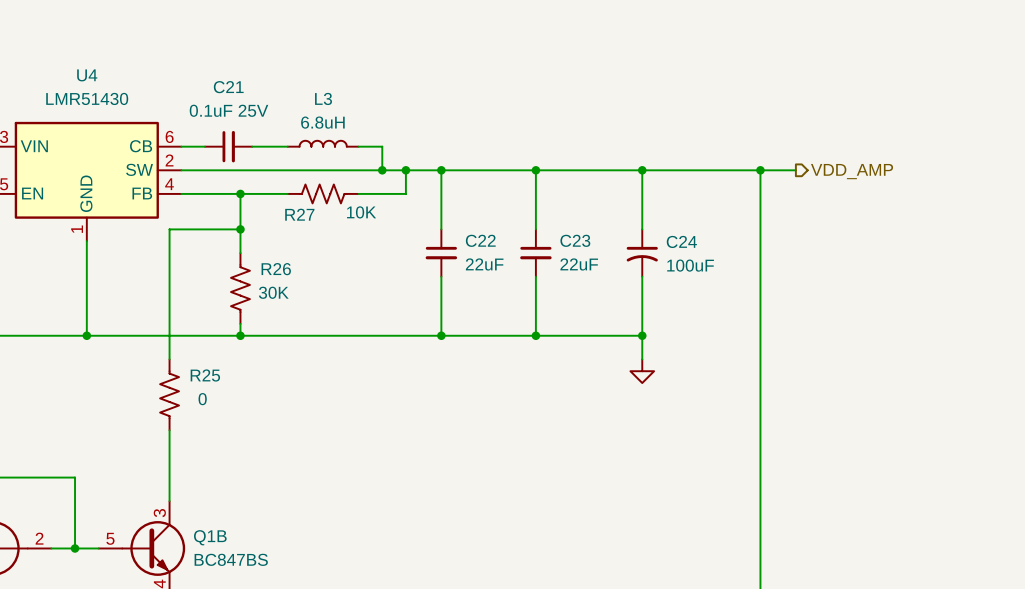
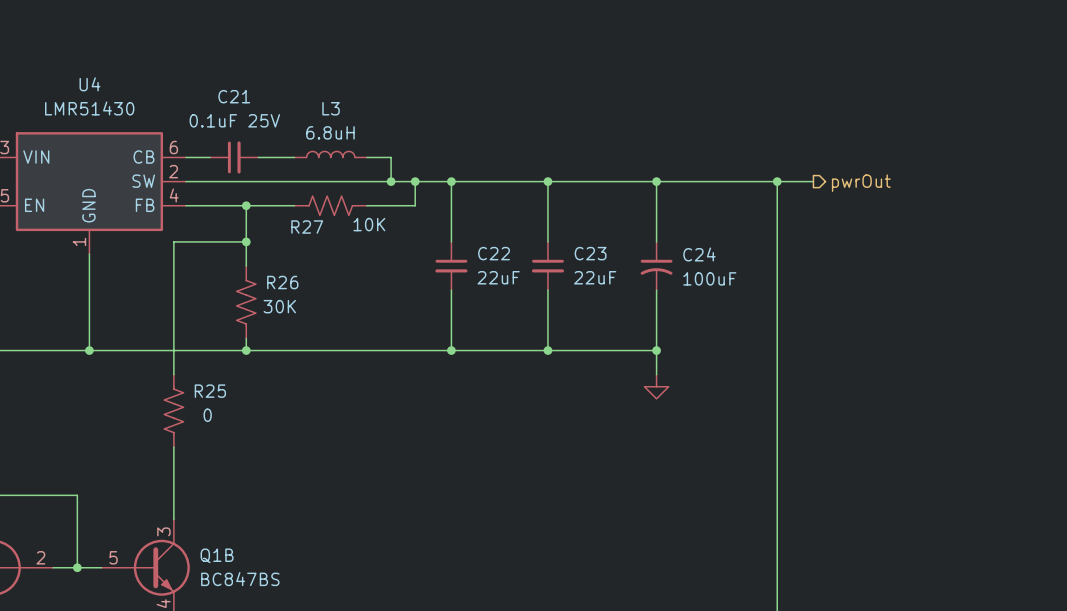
hierarchical label: VDD_AMP (852, 171) -> pwrOut (861, 183)

